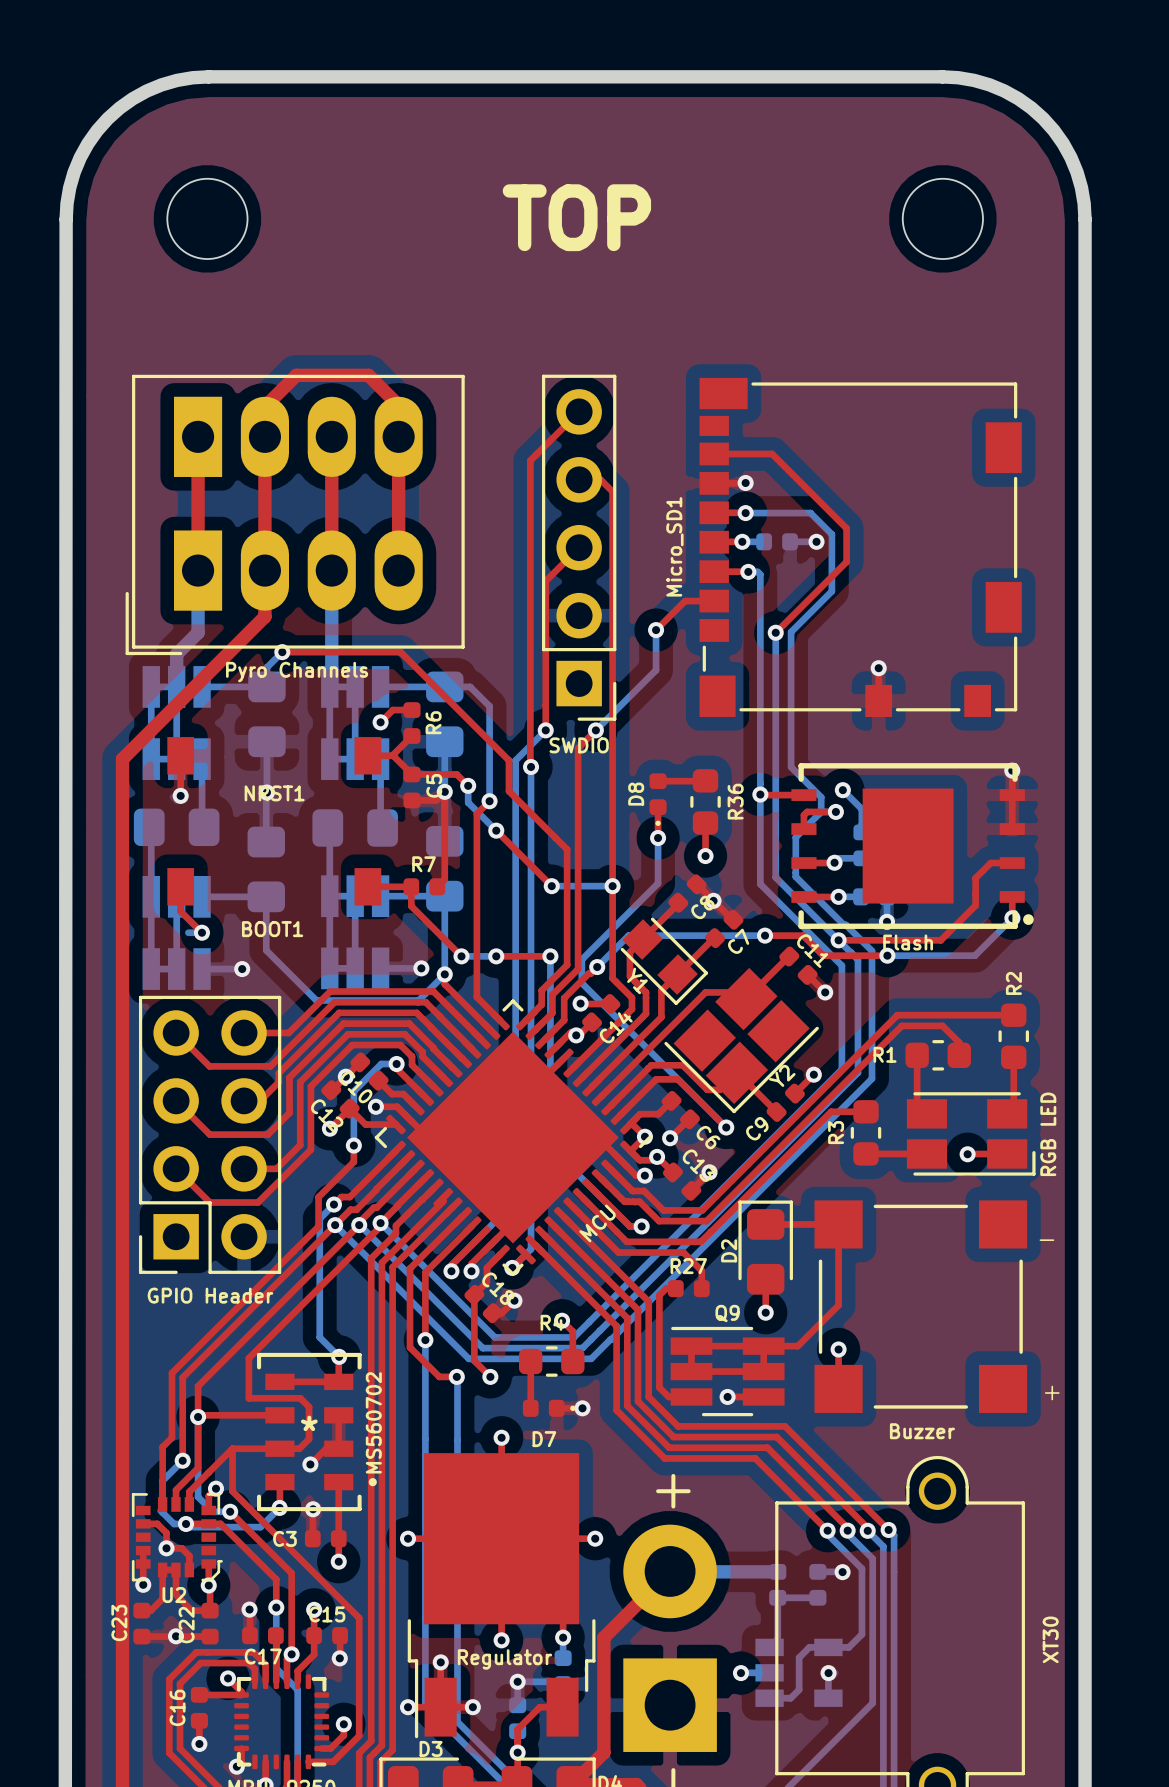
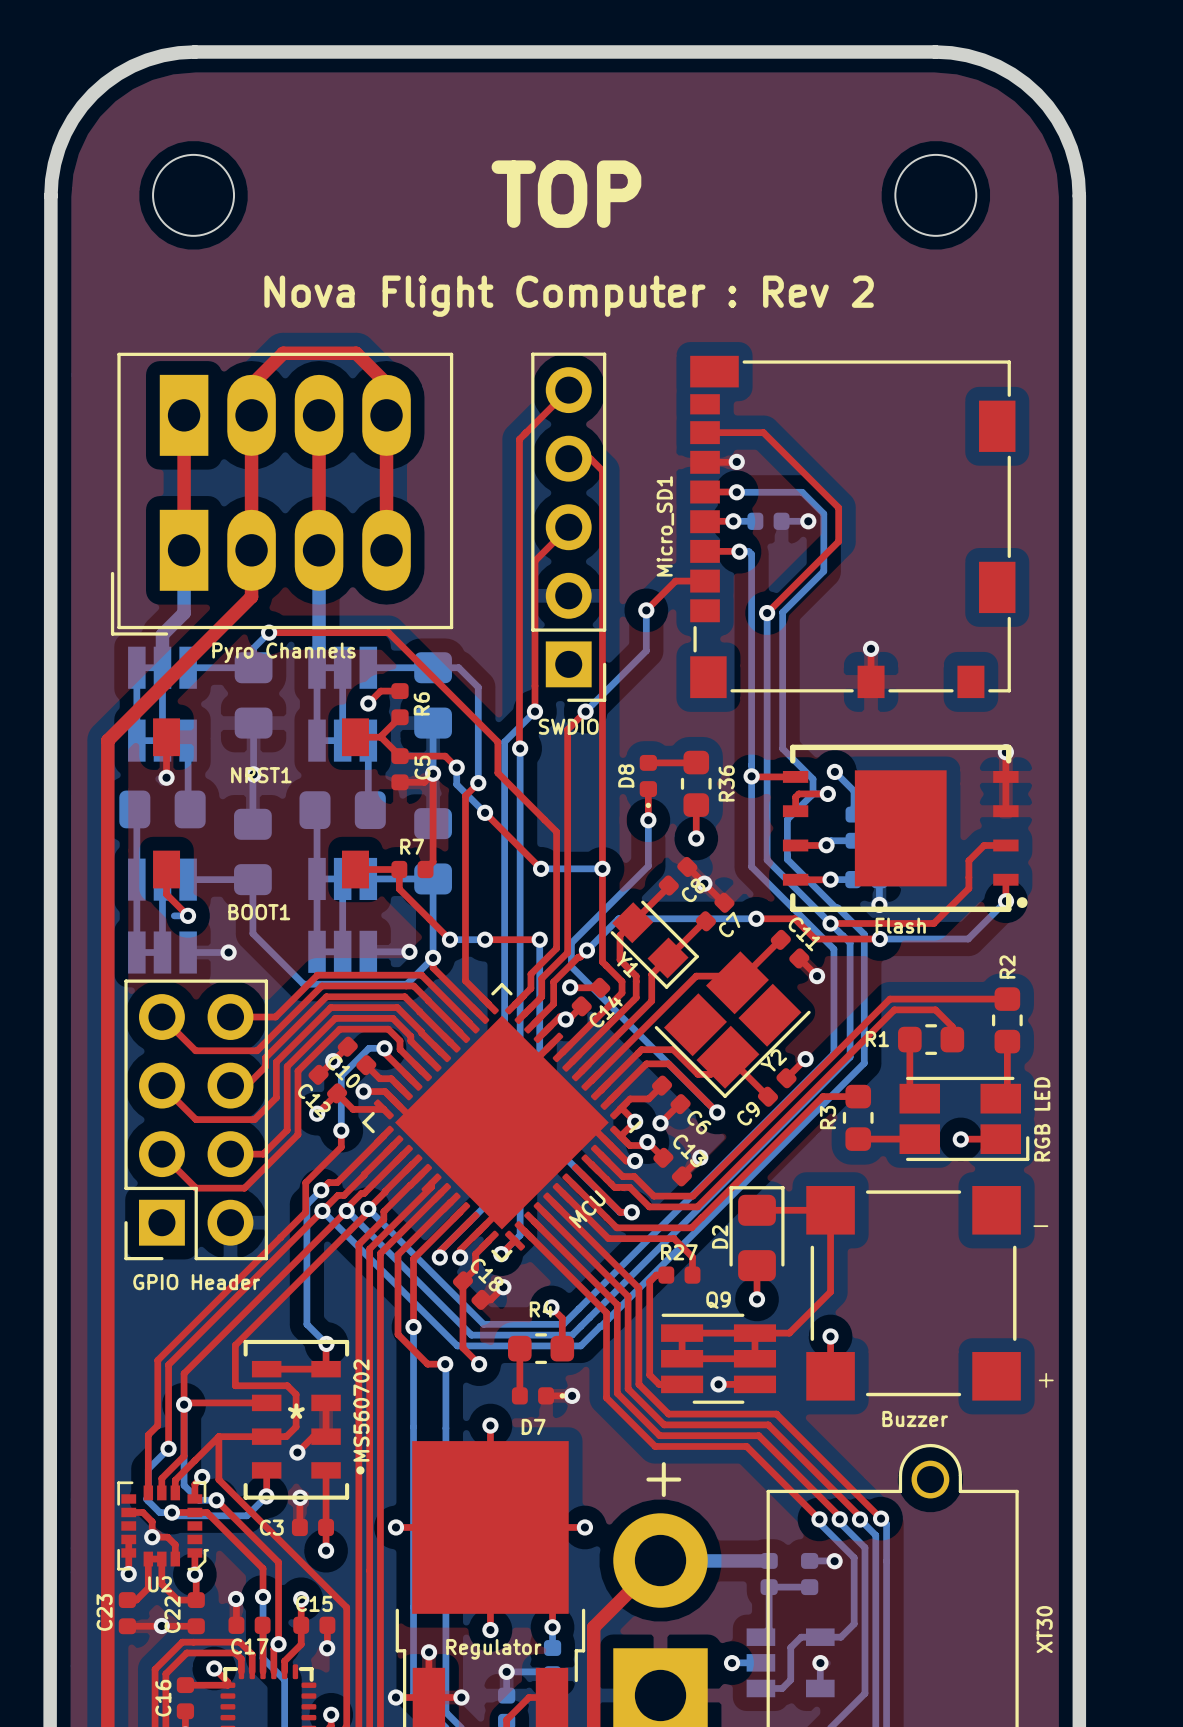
text: none -> Nova Flight Computer : Rev 2 (569, 296)

